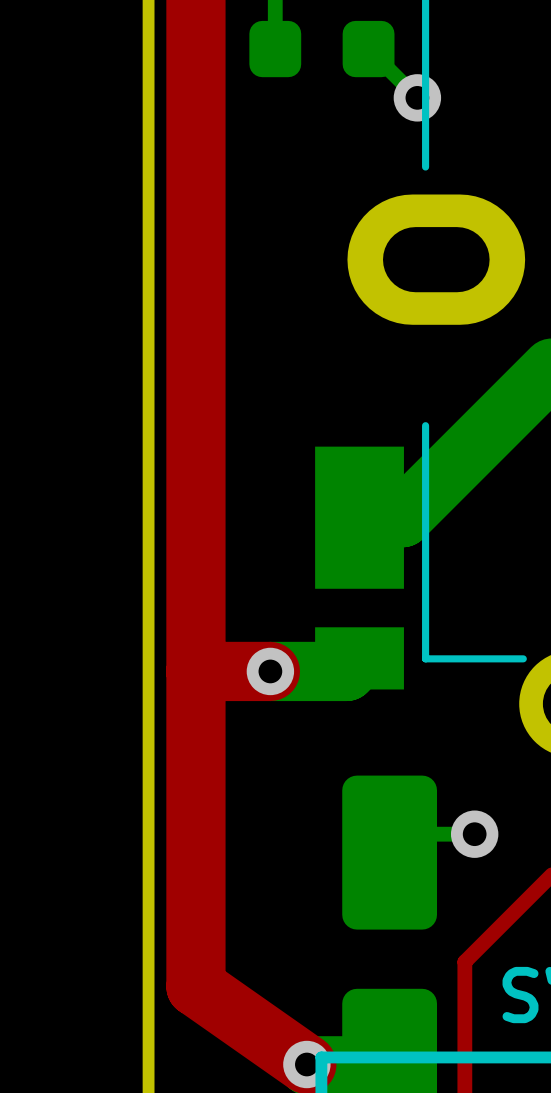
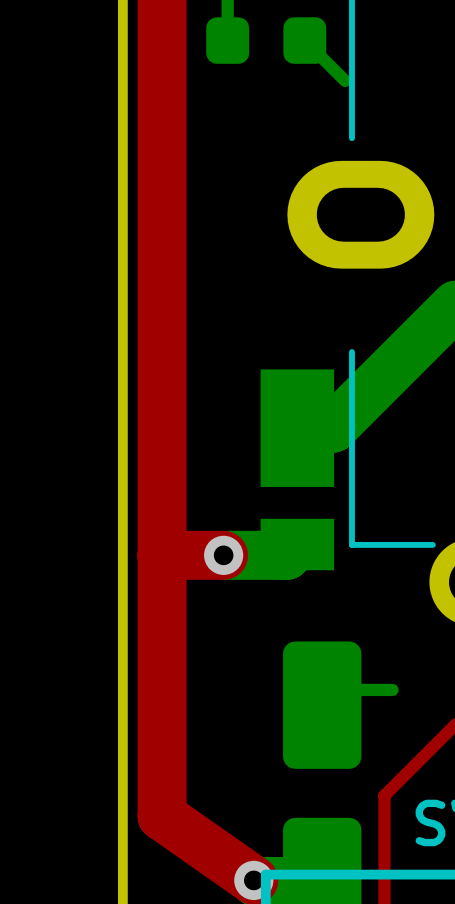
via: (417, 97) -> none
via: (474, 834) -> none

